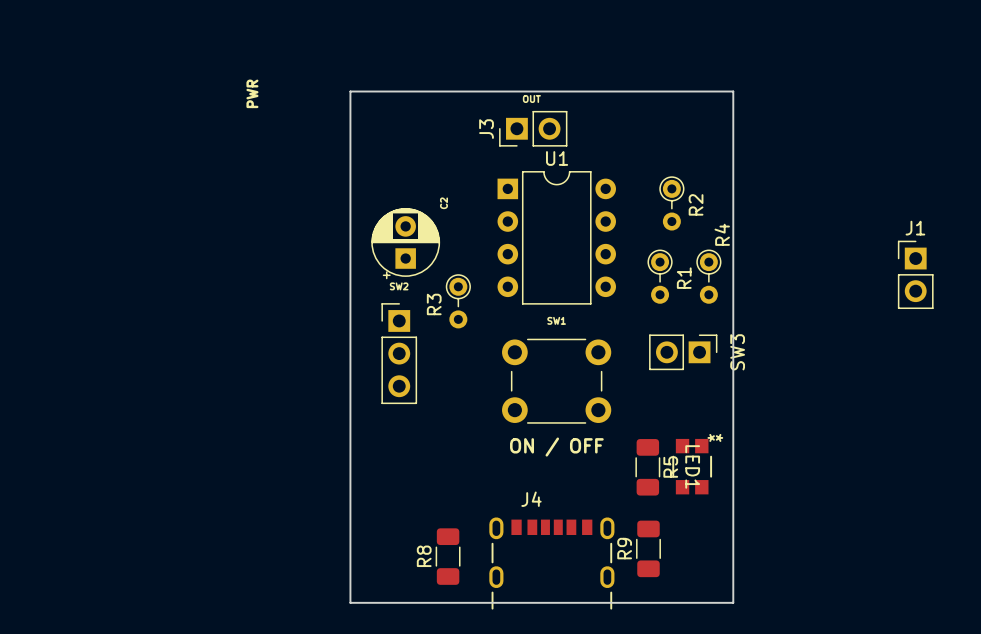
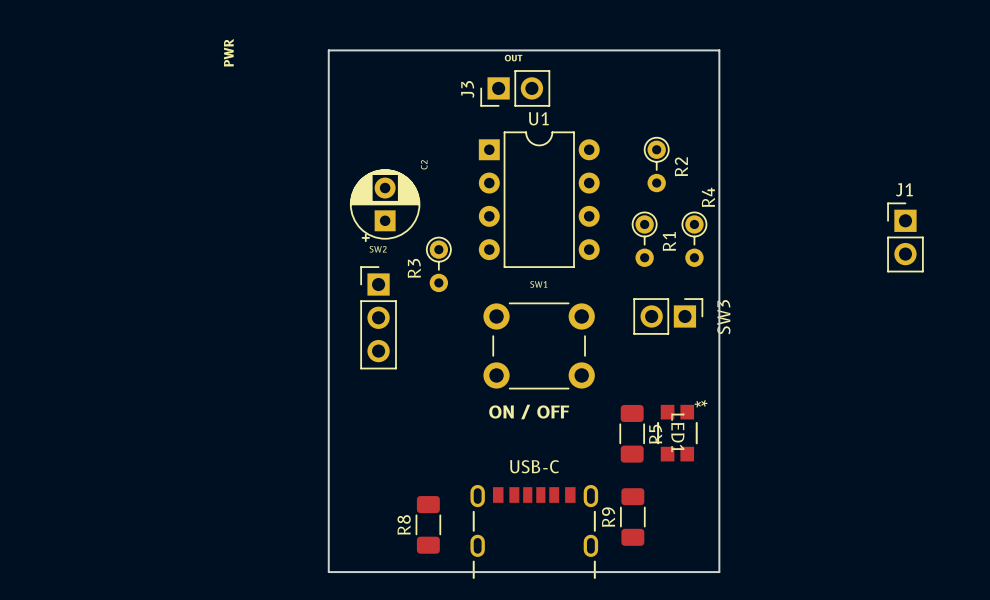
J4 name: J4 (531, 499) -> USB-C (534, 466)

